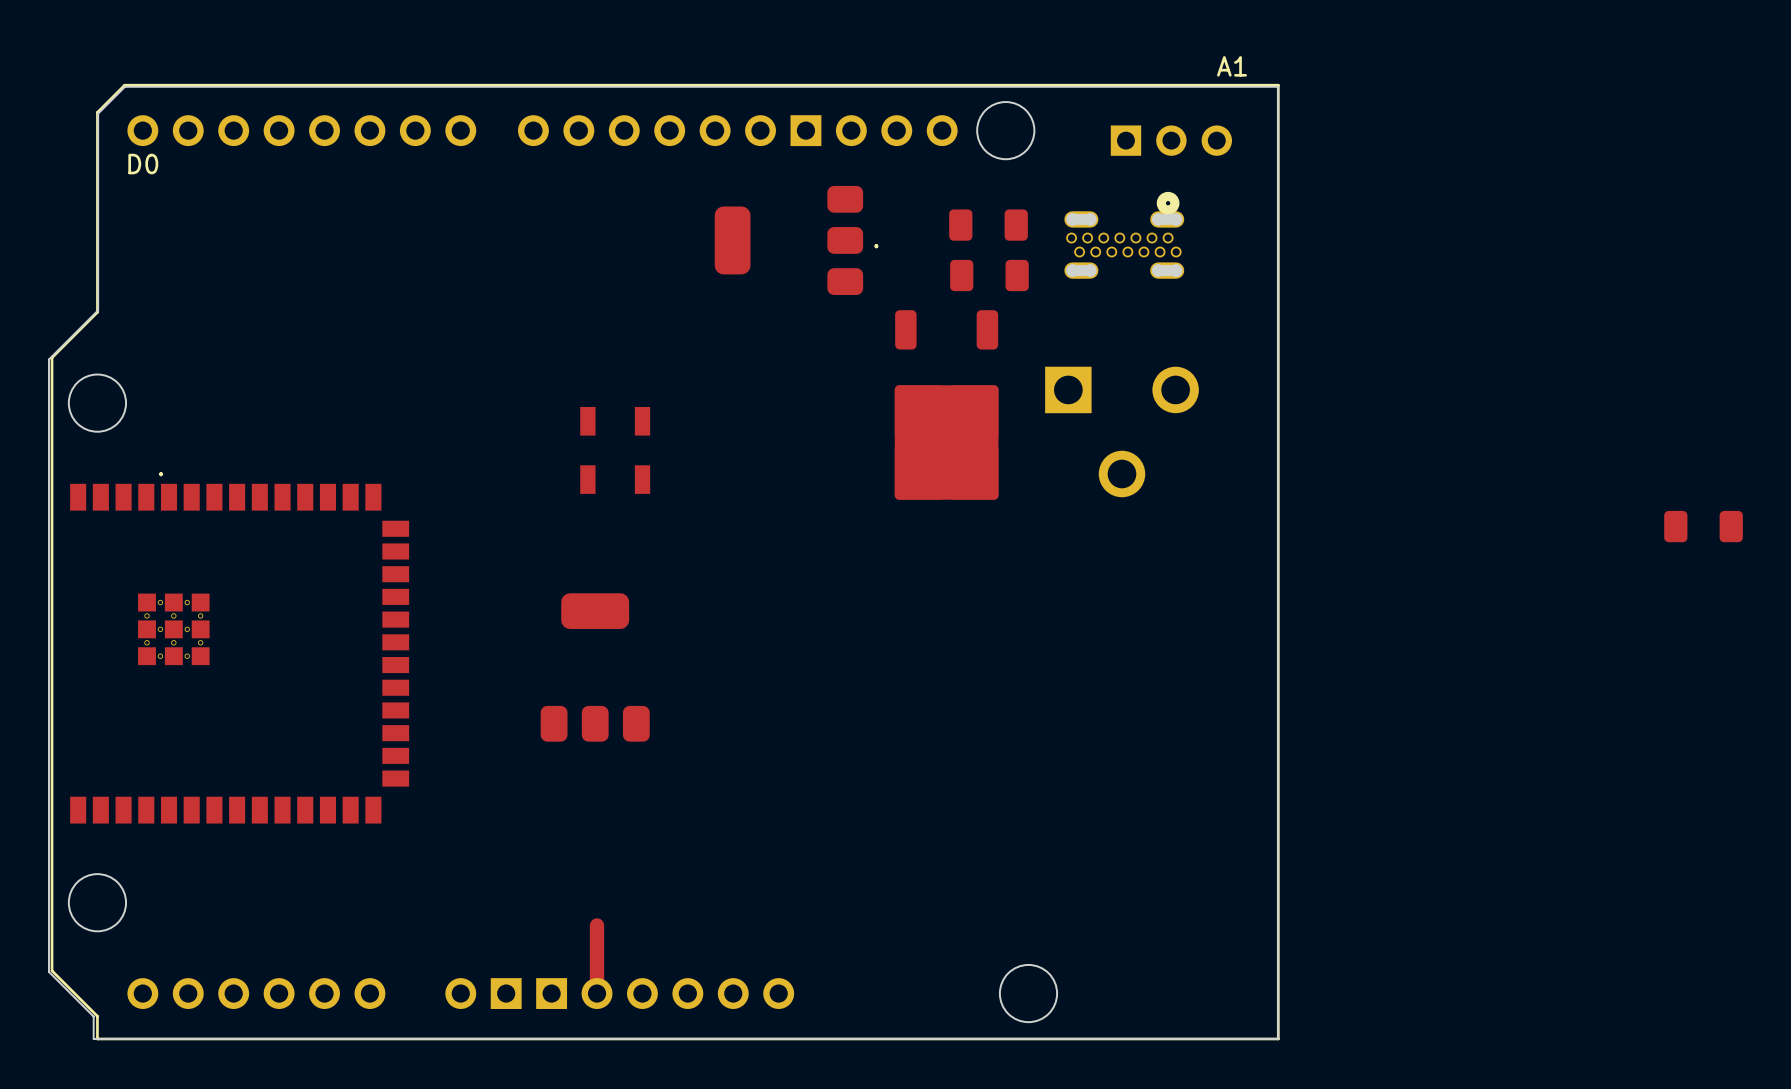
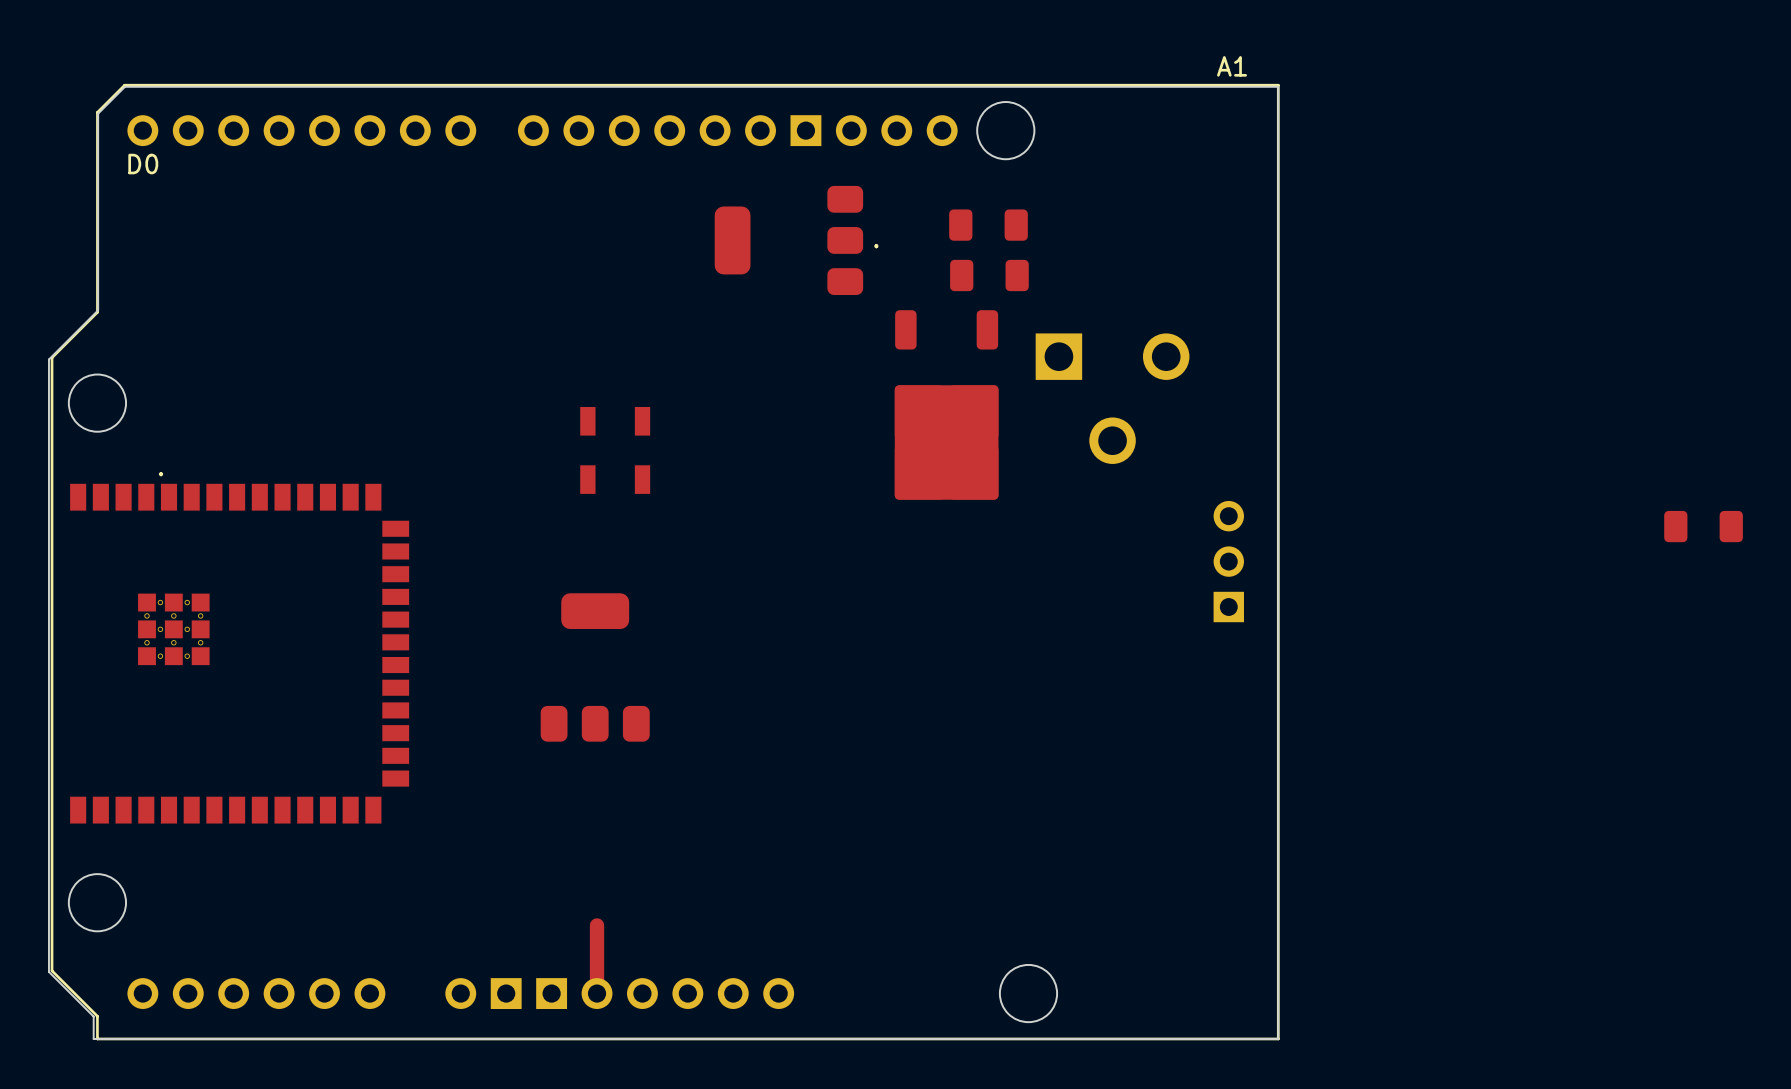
part rotation: 0° (1171, 140) -> 90° counterclockwise (1228, 561)
part position: (1171, 140) -> (1228, 561)
part: (1124, 235) -> none
part position: (1122, 431) -> (1112, 398)

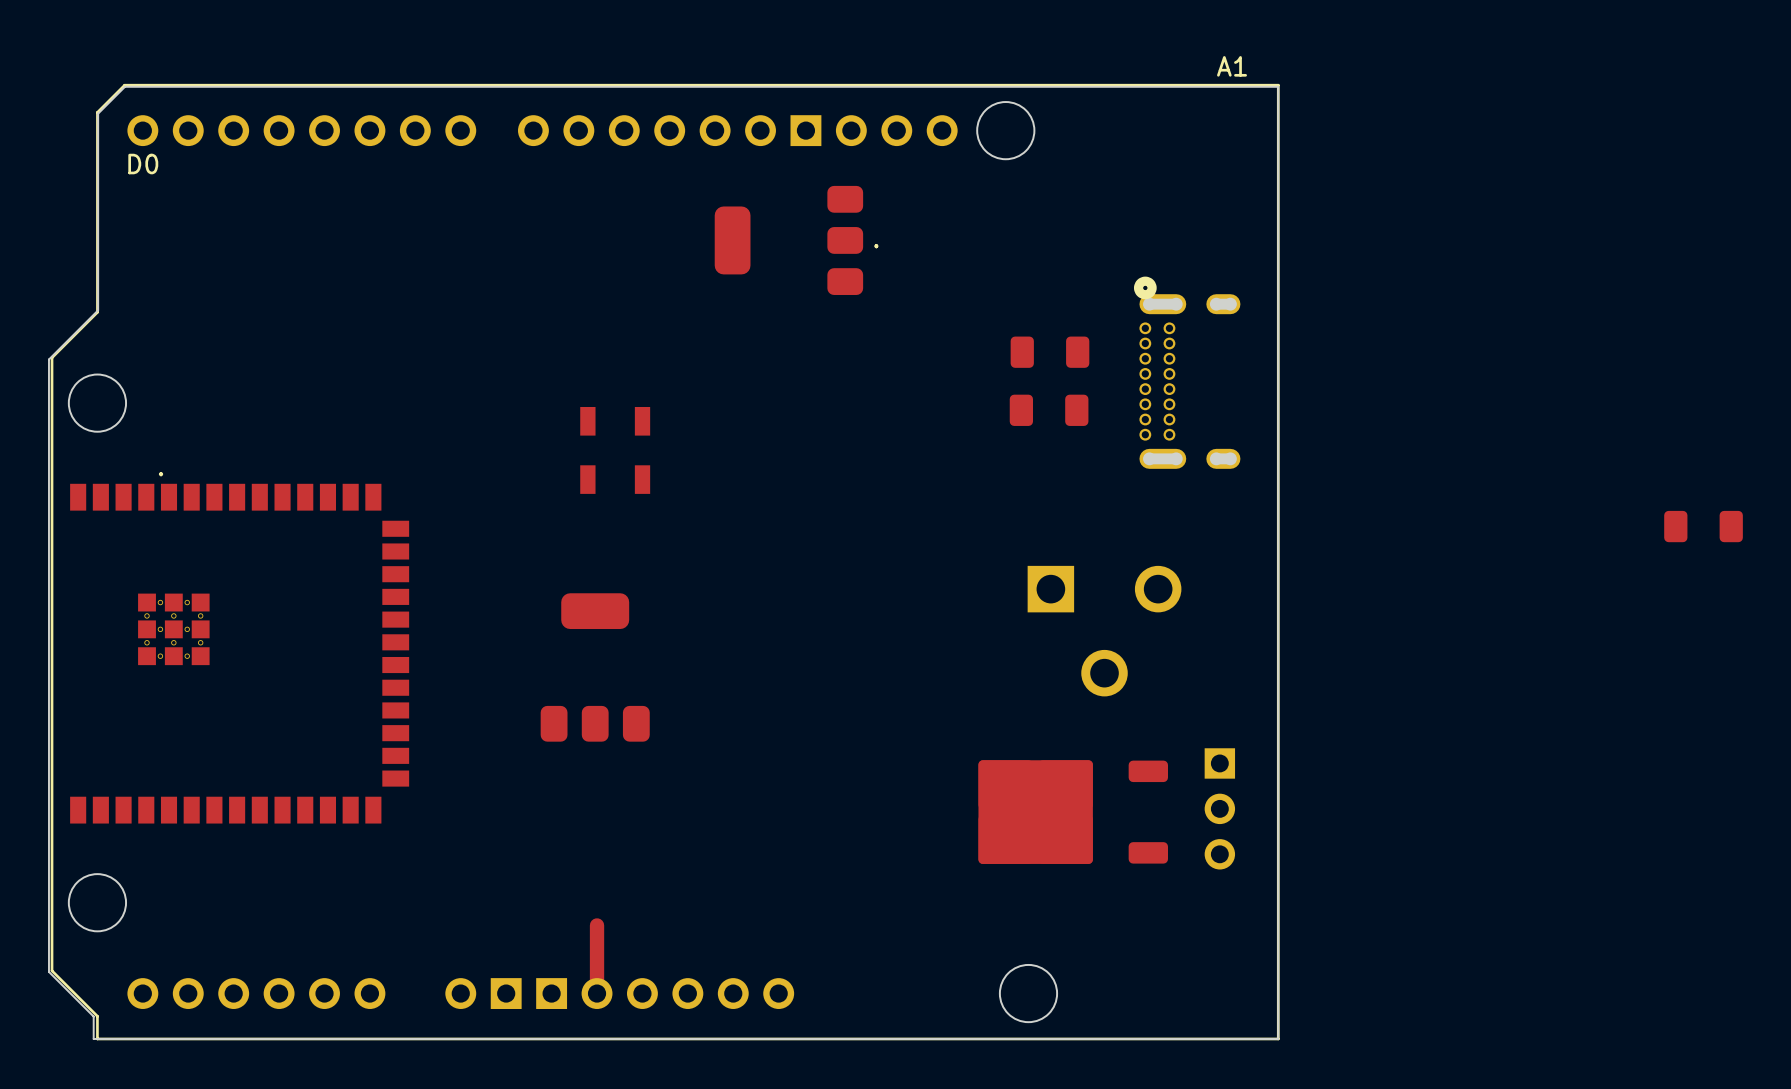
part: (988, 225) -> none
part: (989, 275) -> none
part: none -> (1049, 352)
part: none -> (1187, 372)
part position: (1112, 398) -> (1104, 631)
part rotation: 0° (946, 404) -> 90° clockwise (1073, 812)
part position: (946, 404) -> (1073, 812)
part: none -> (1049, 410)
part rotation: 0° (1228, 561) -> 180° (1219, 808)
part position: (1228, 561) -> (1219, 808)

